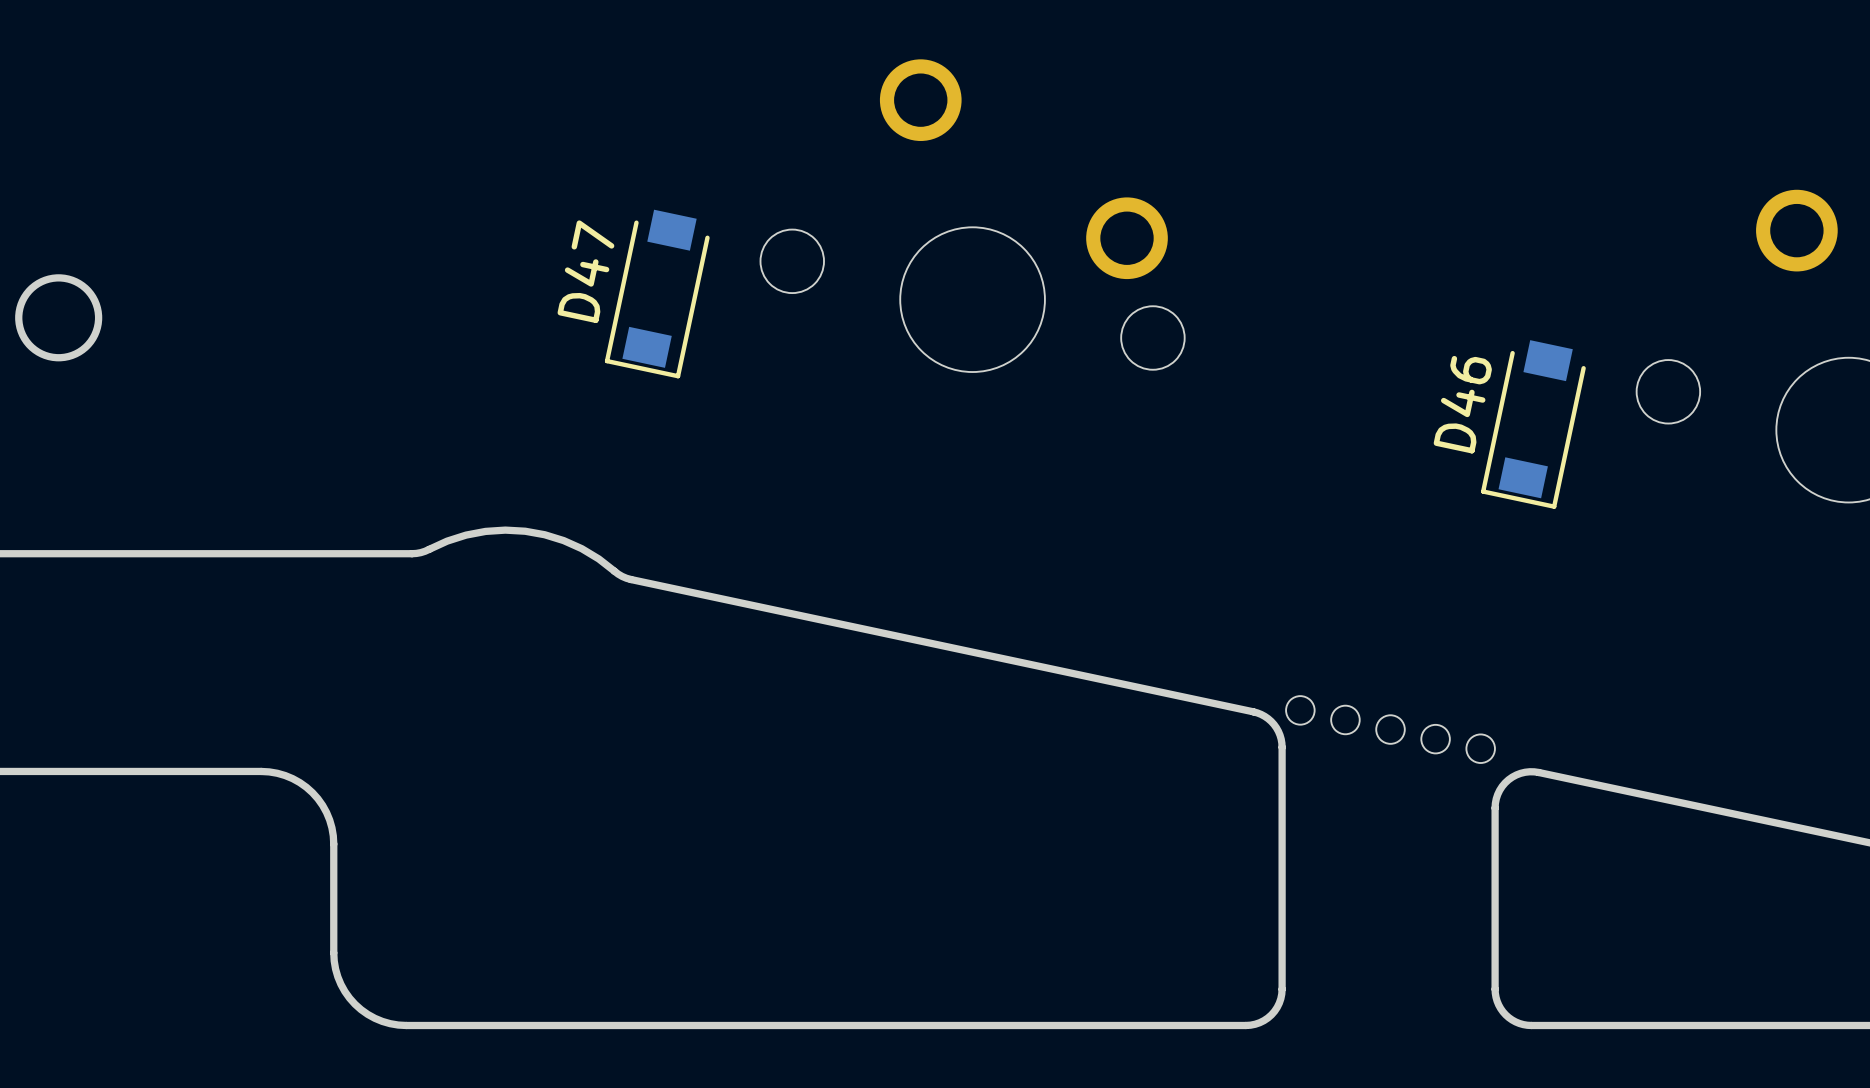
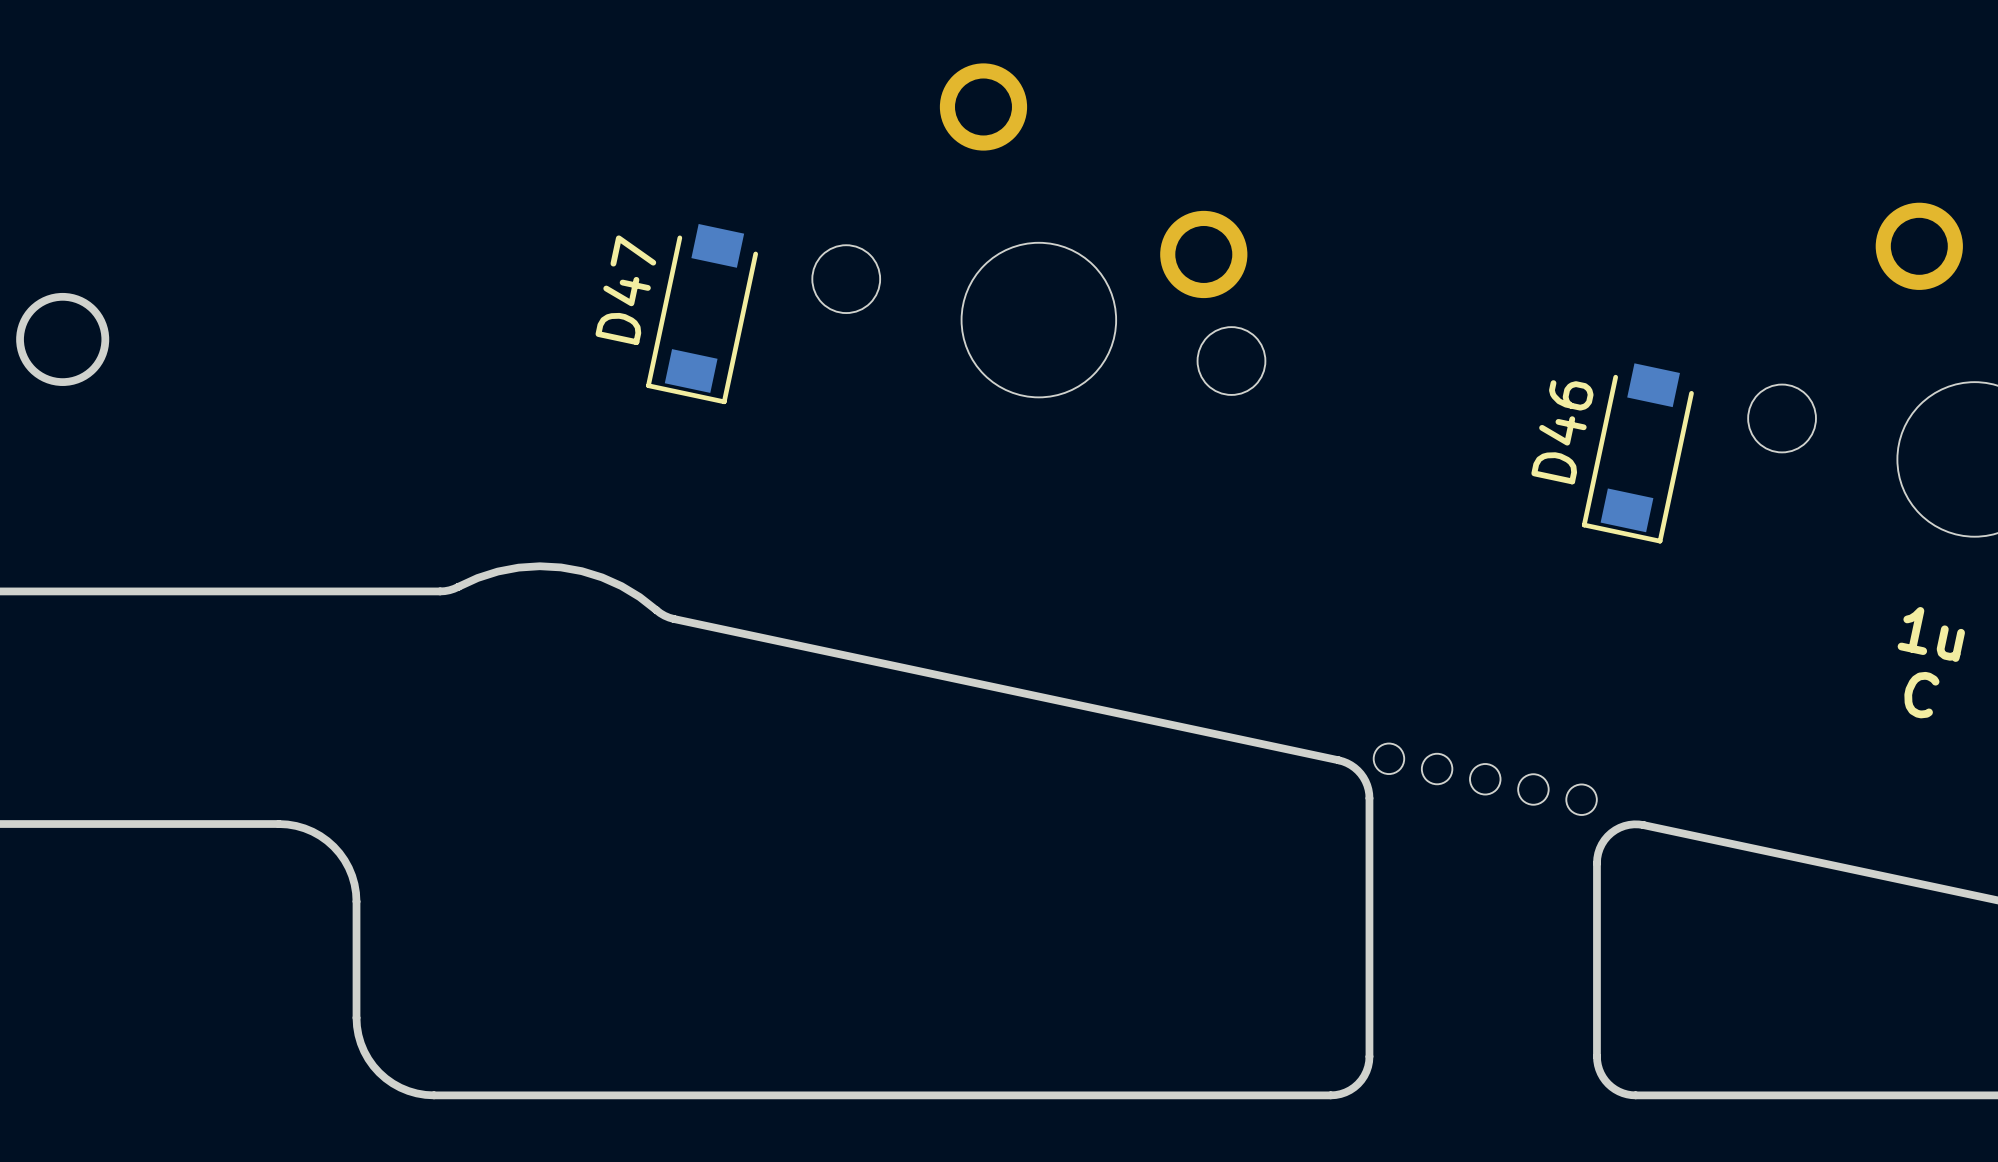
text: none -> 1u (1931, 634)
text: none -> C (1921, 695)

